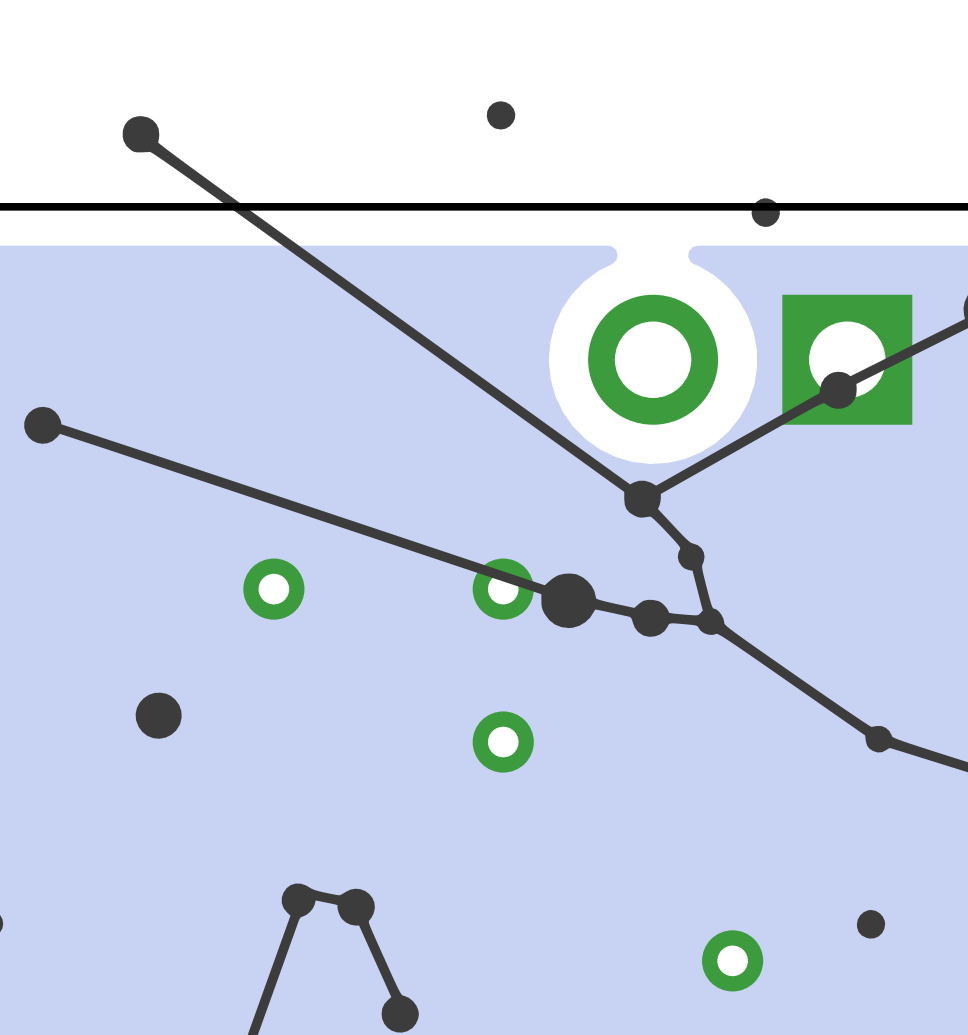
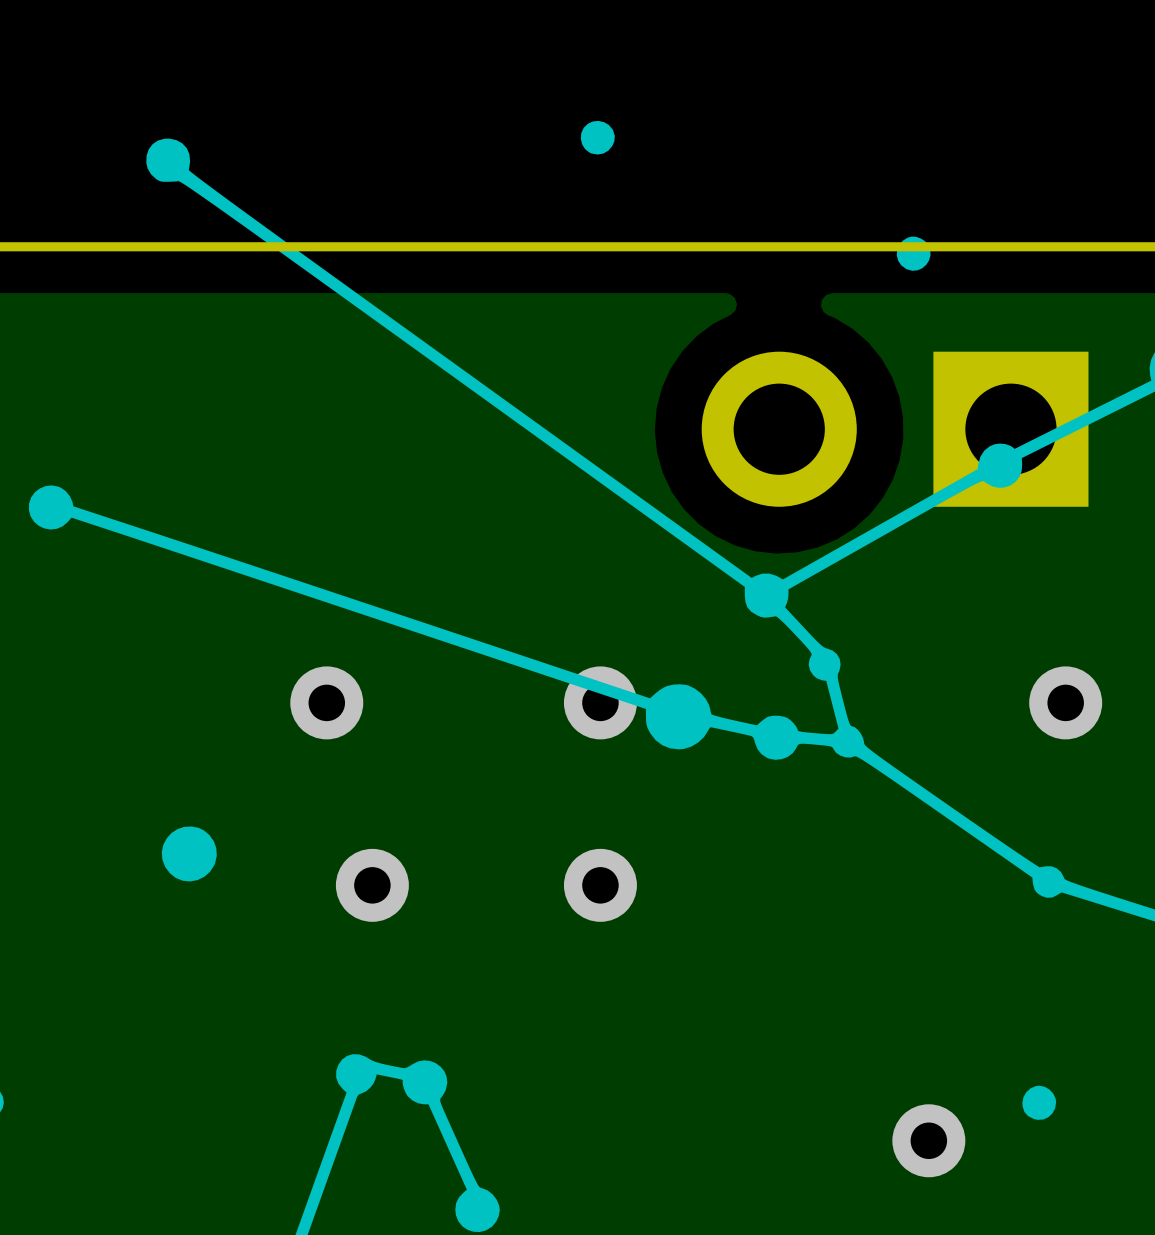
via: none -> (1065, 702)
via: none -> (372, 885)
via position: (732, 960) -> (928, 1140)

